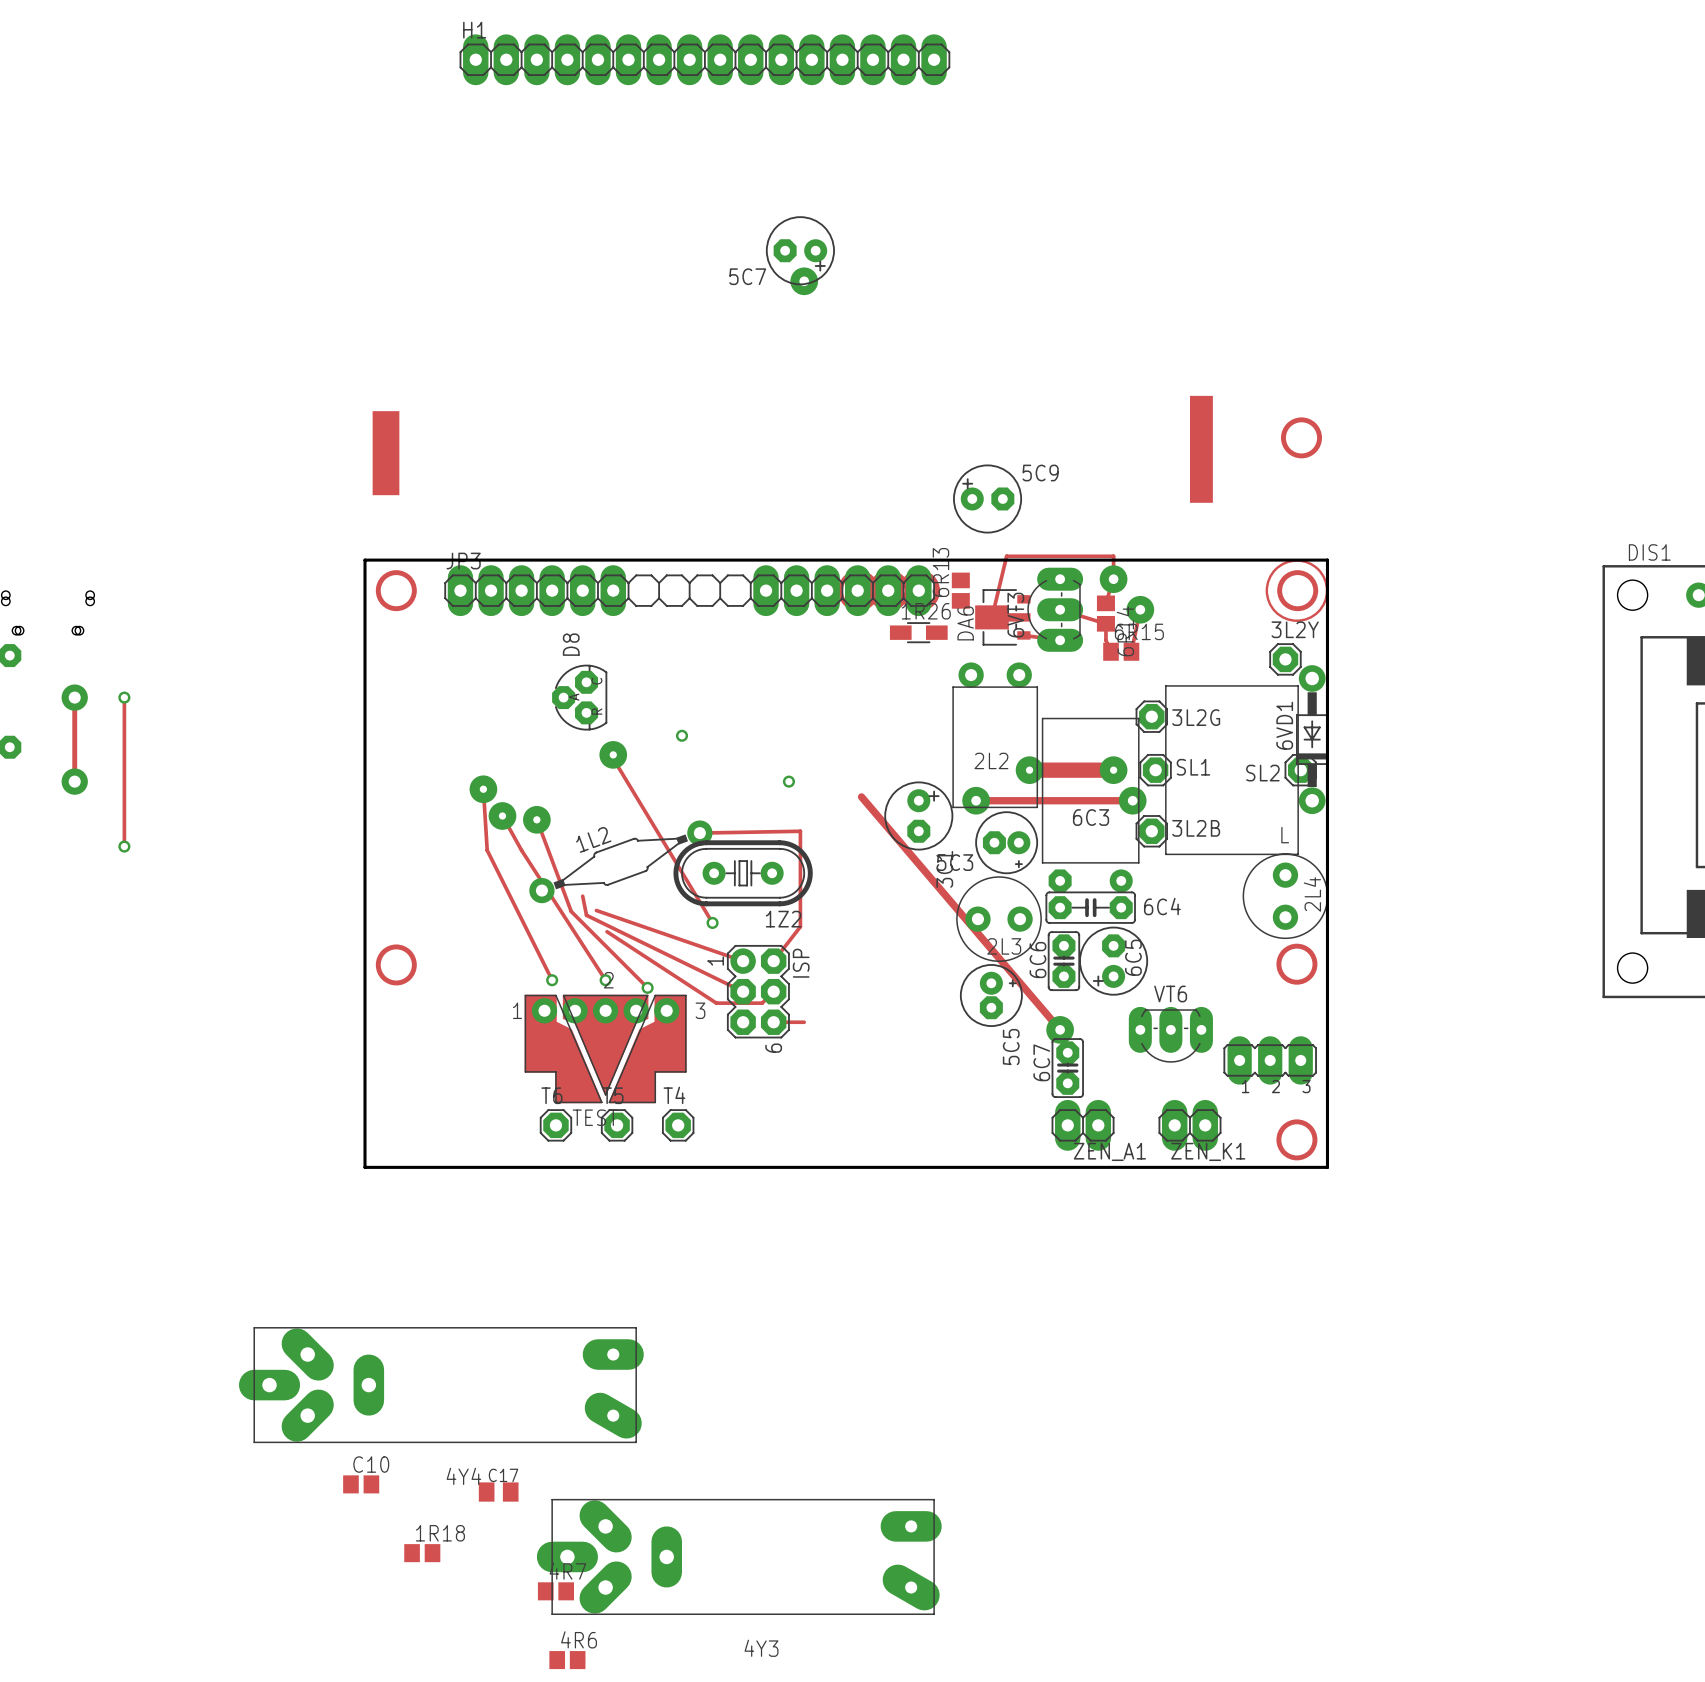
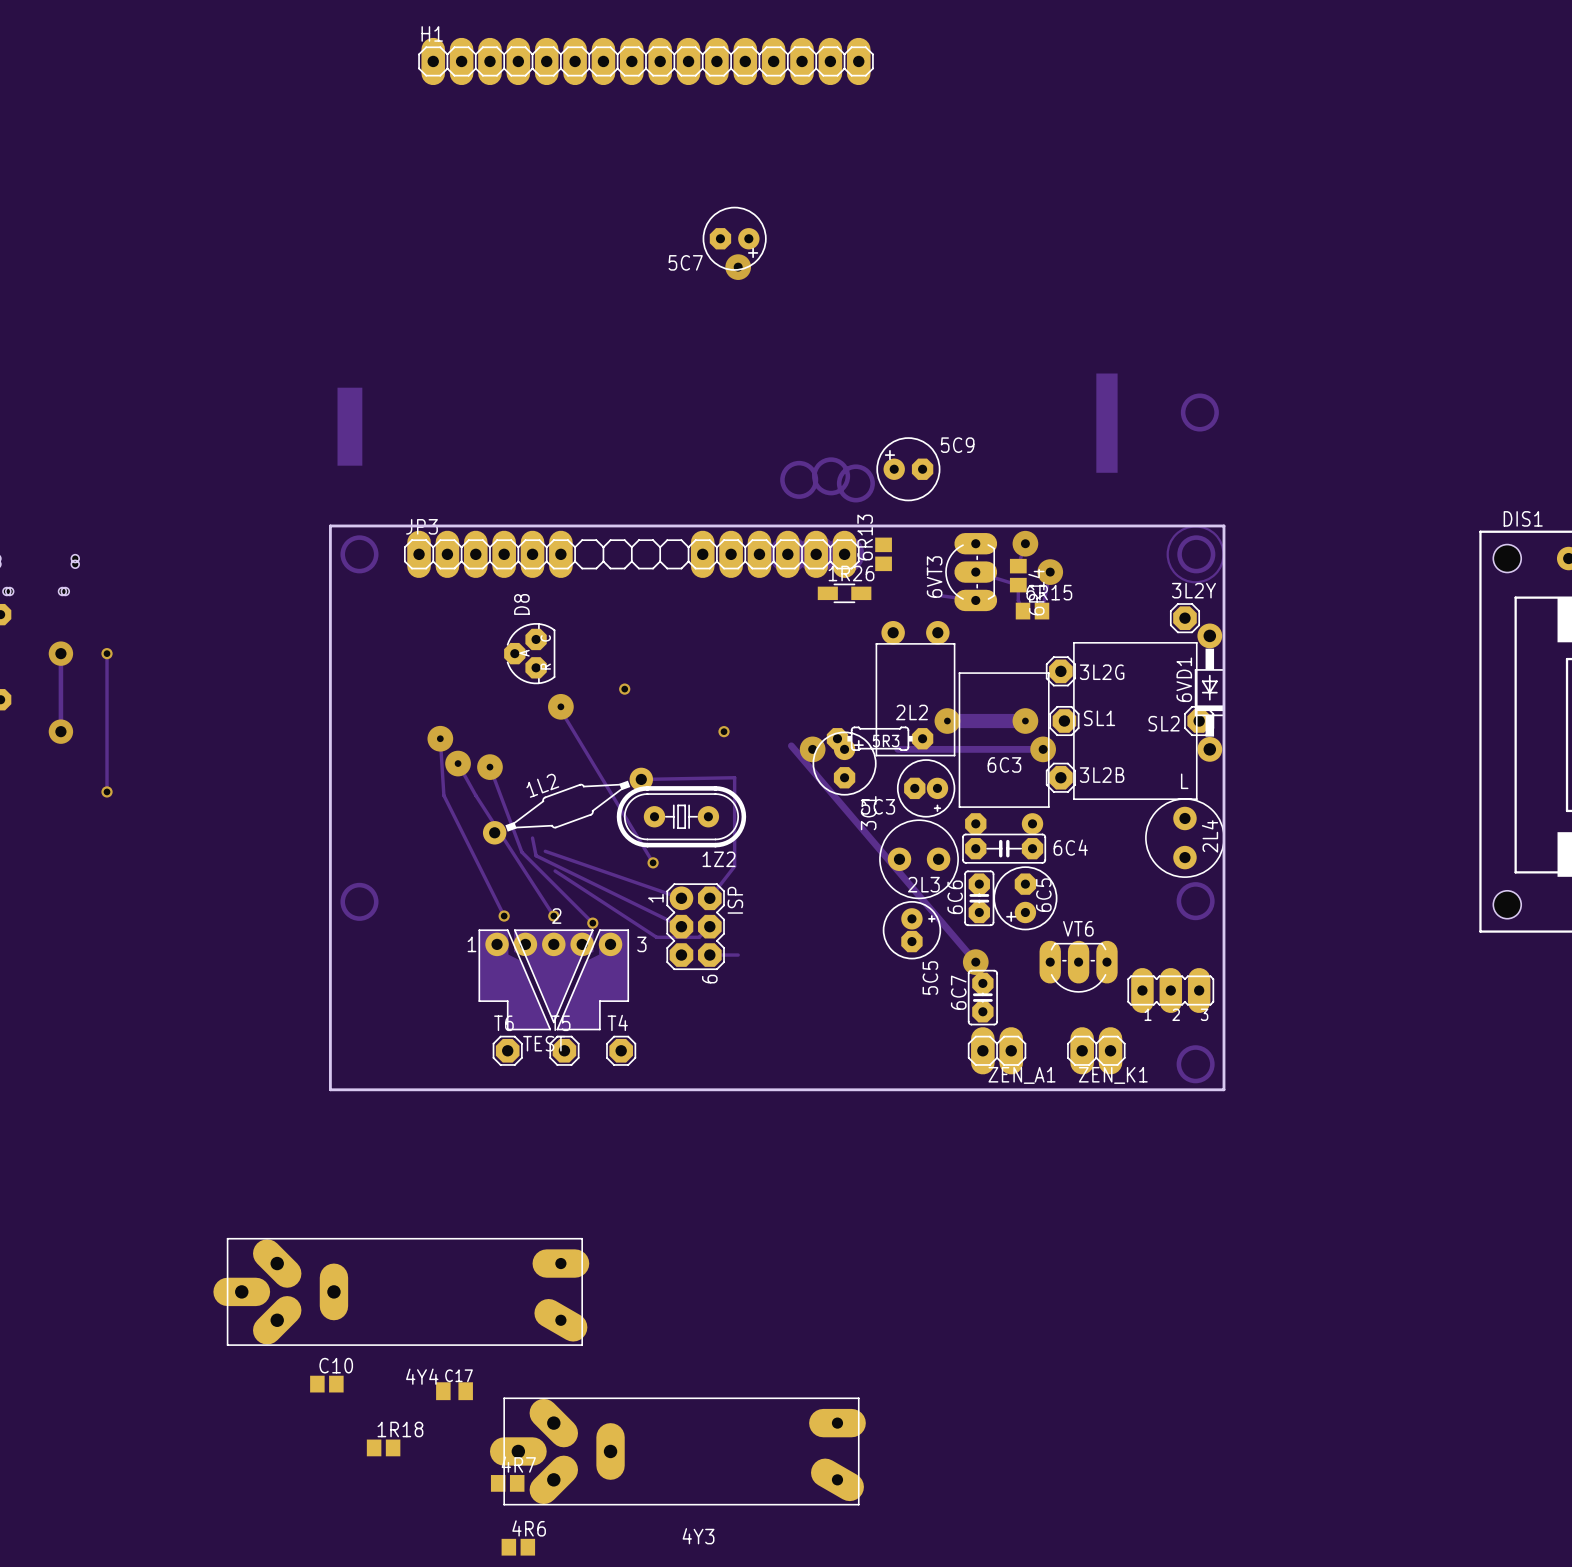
drawing: none -> [780, 457, 875, 503]
track: (1113, 579) (1113, 556) (1006, 556) (992, 617) (1019, 617) -> none
DA6: (1002, 617) -> none
5R3: none -> (880, 738)
via: none -> (812, 749)
via: (976, 800) -> none

